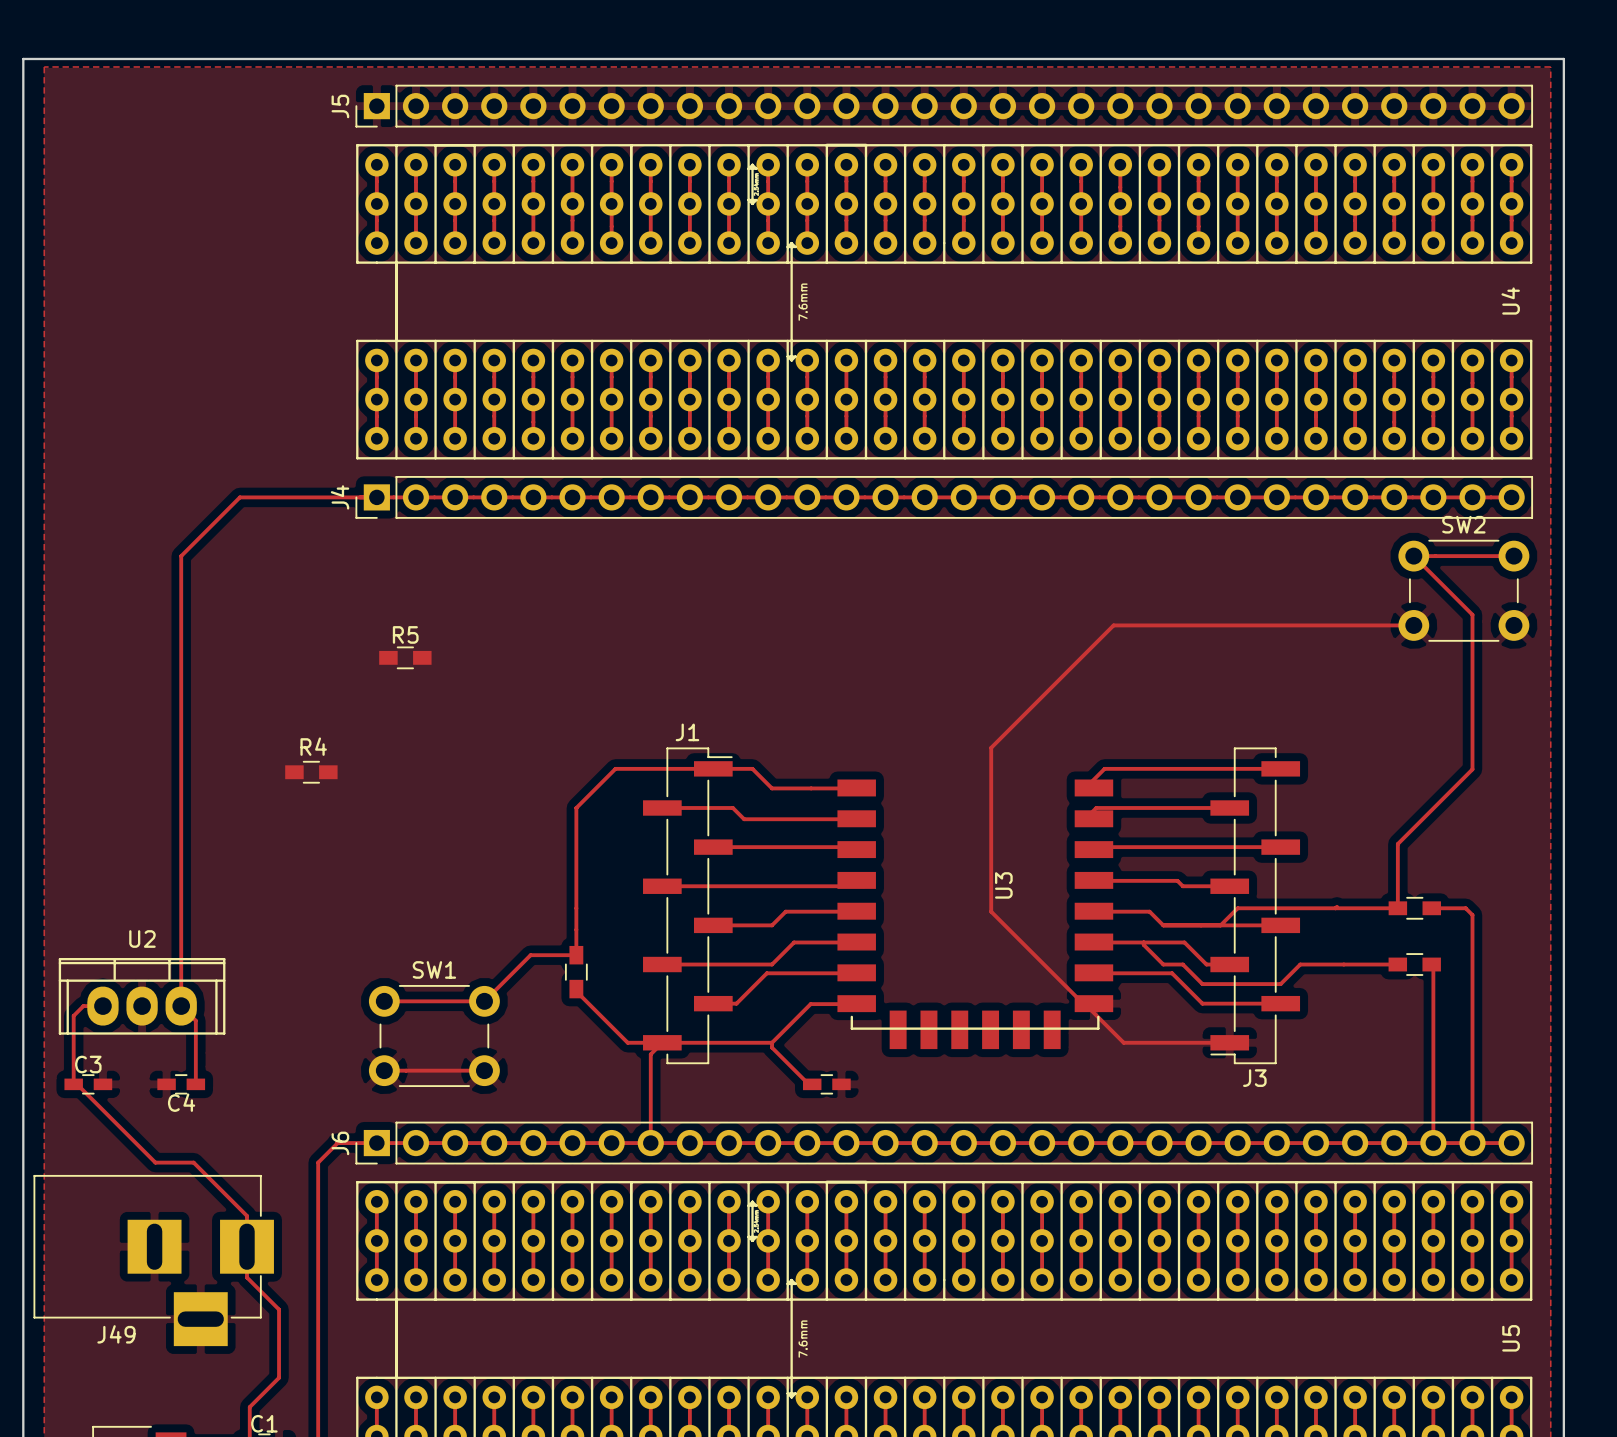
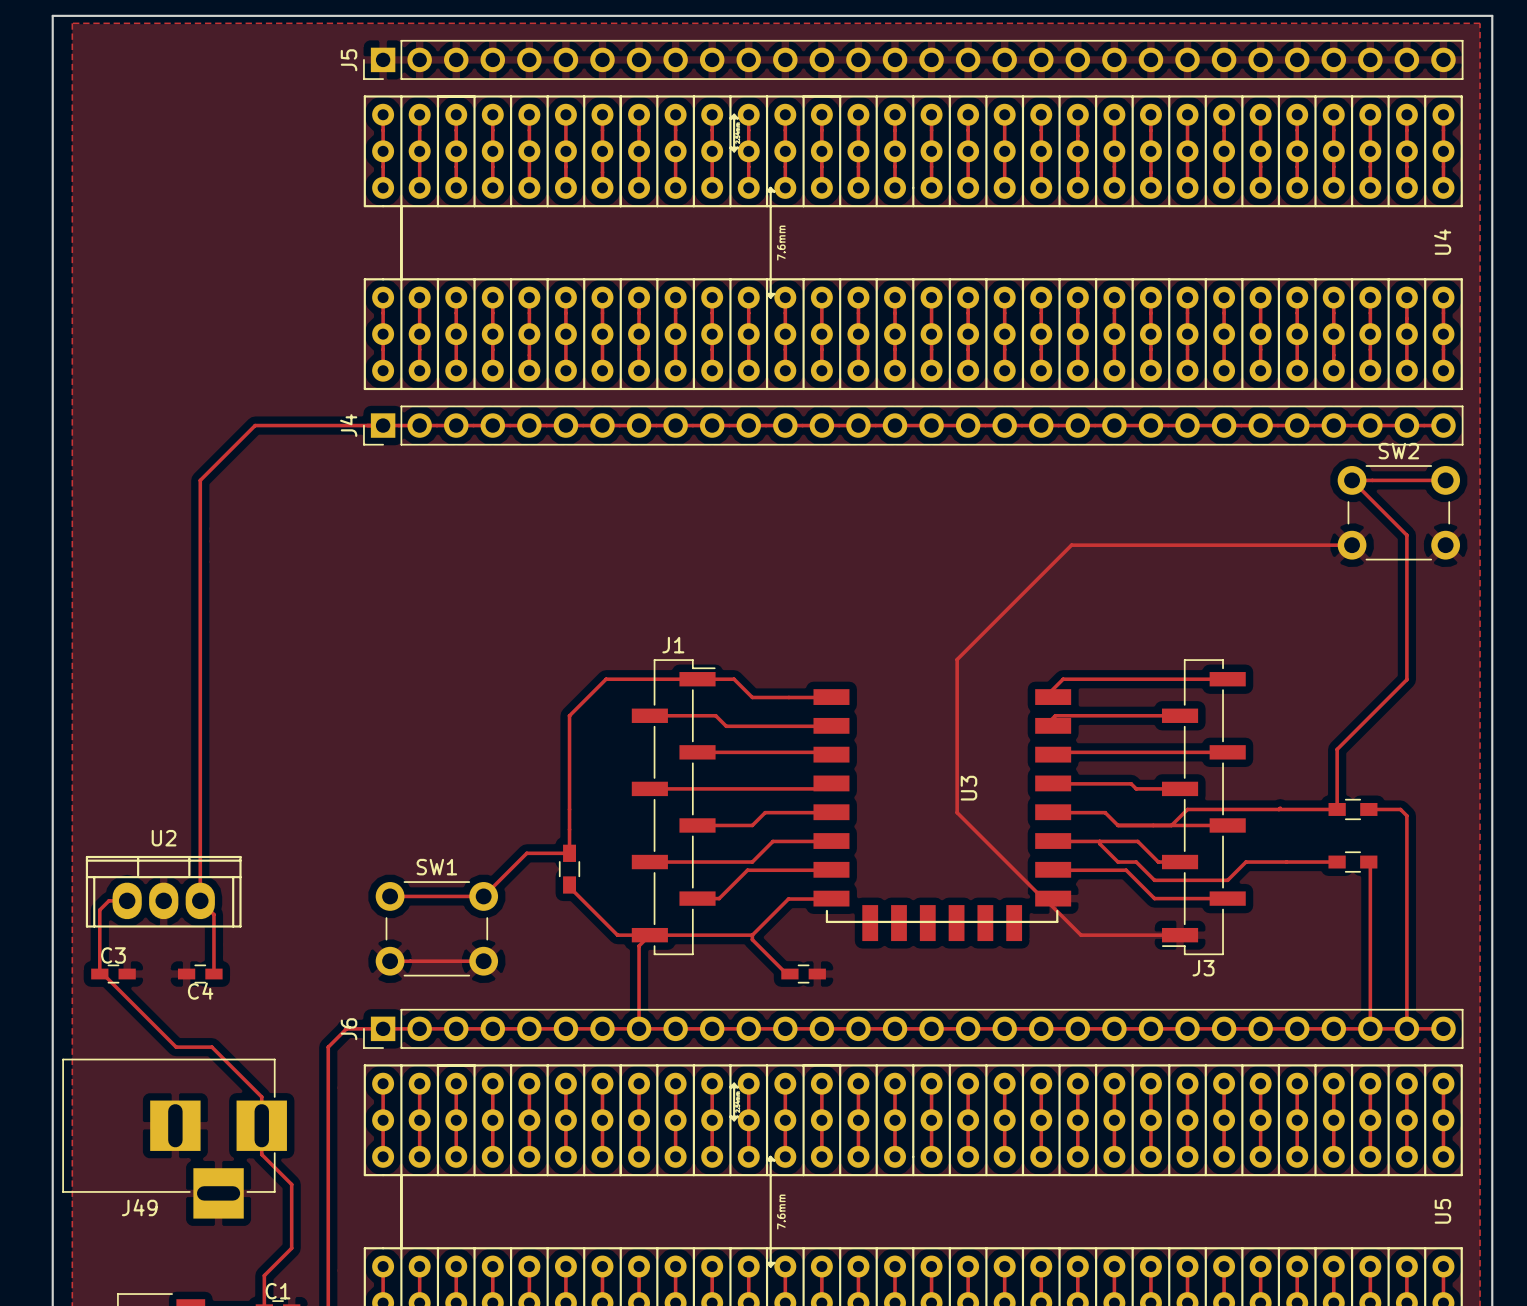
R5: (405, 657) -> none
R4: (311, 772) -> none

